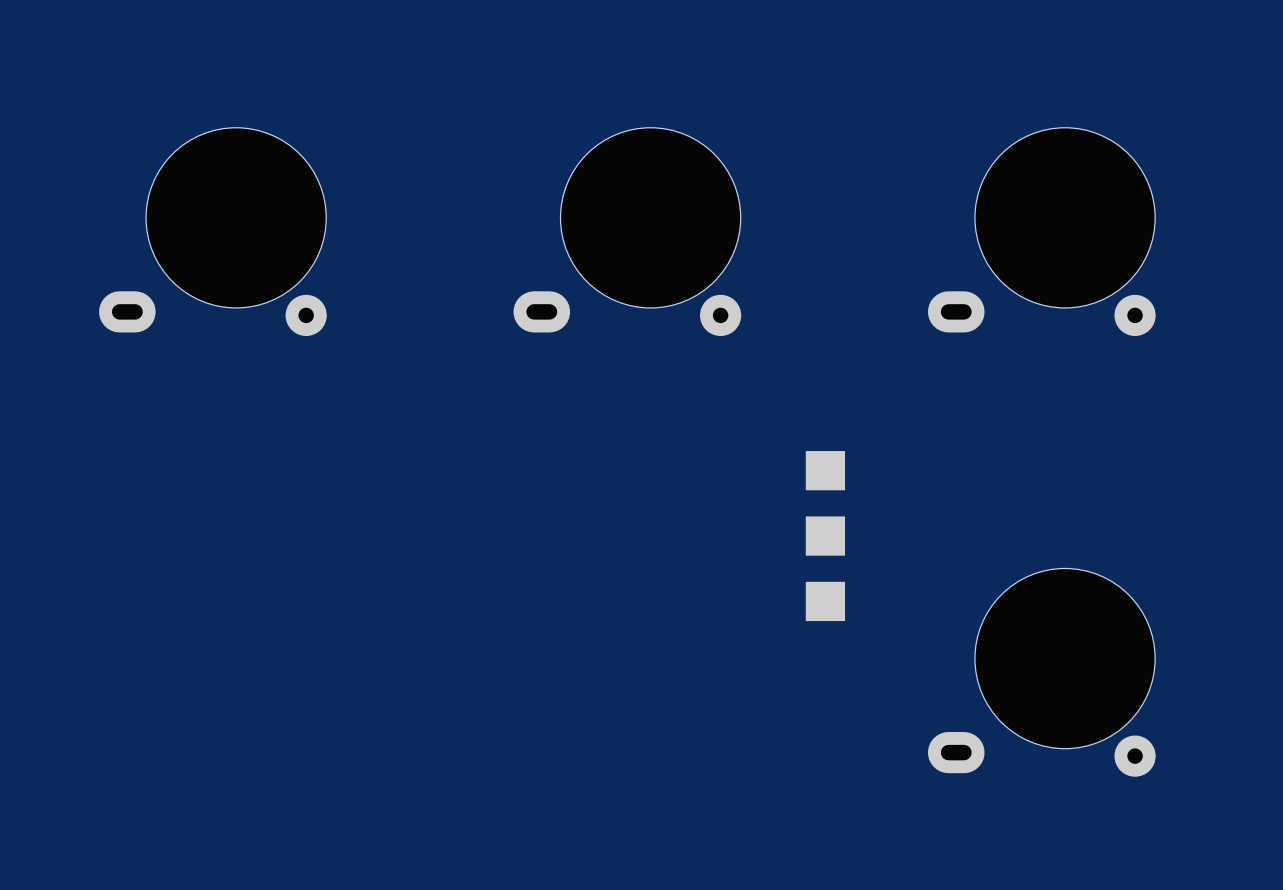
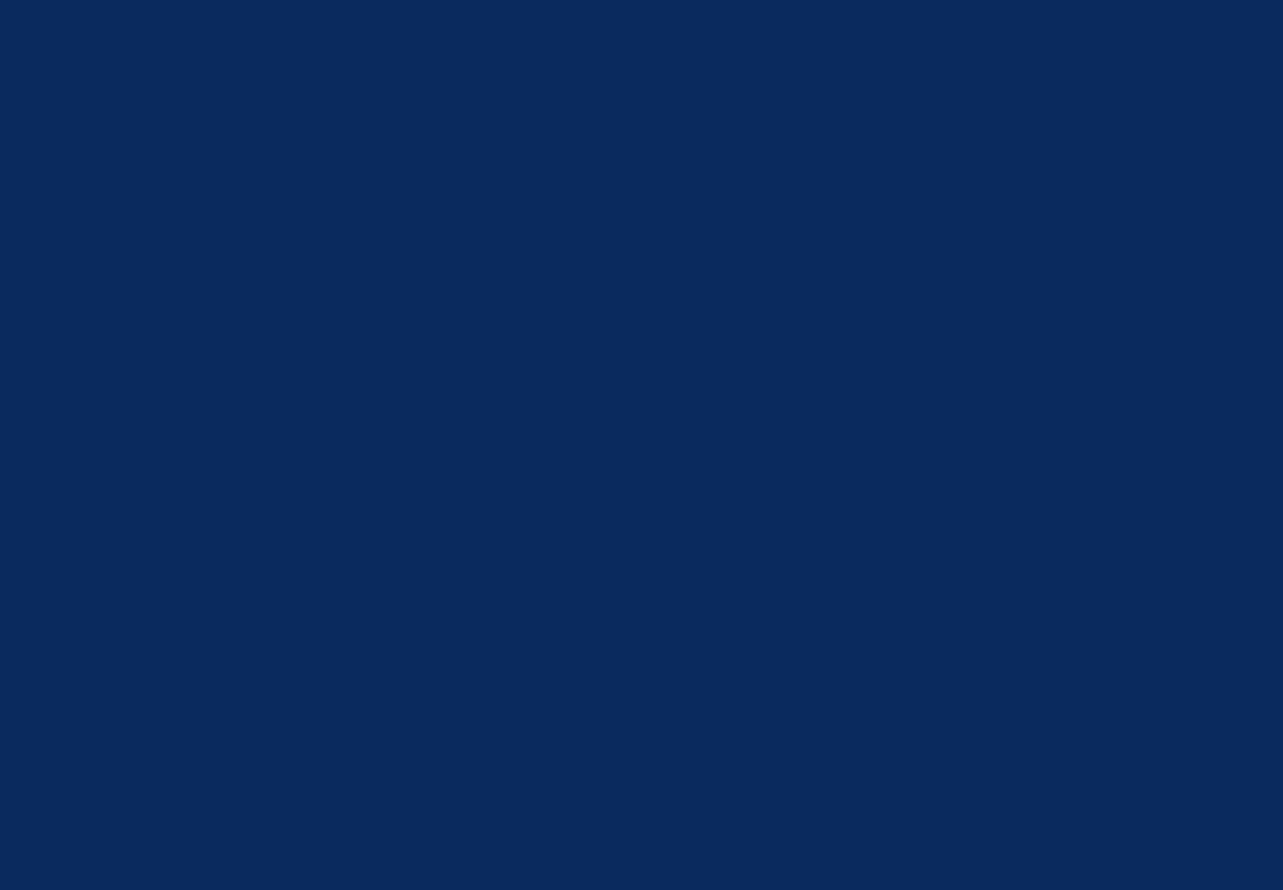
part: (212, 231) -> none
part: (627, 231) -> none
part: (1041, 231) -> none
part: (825, 536) -> none
part: (1041, 672) -> none

